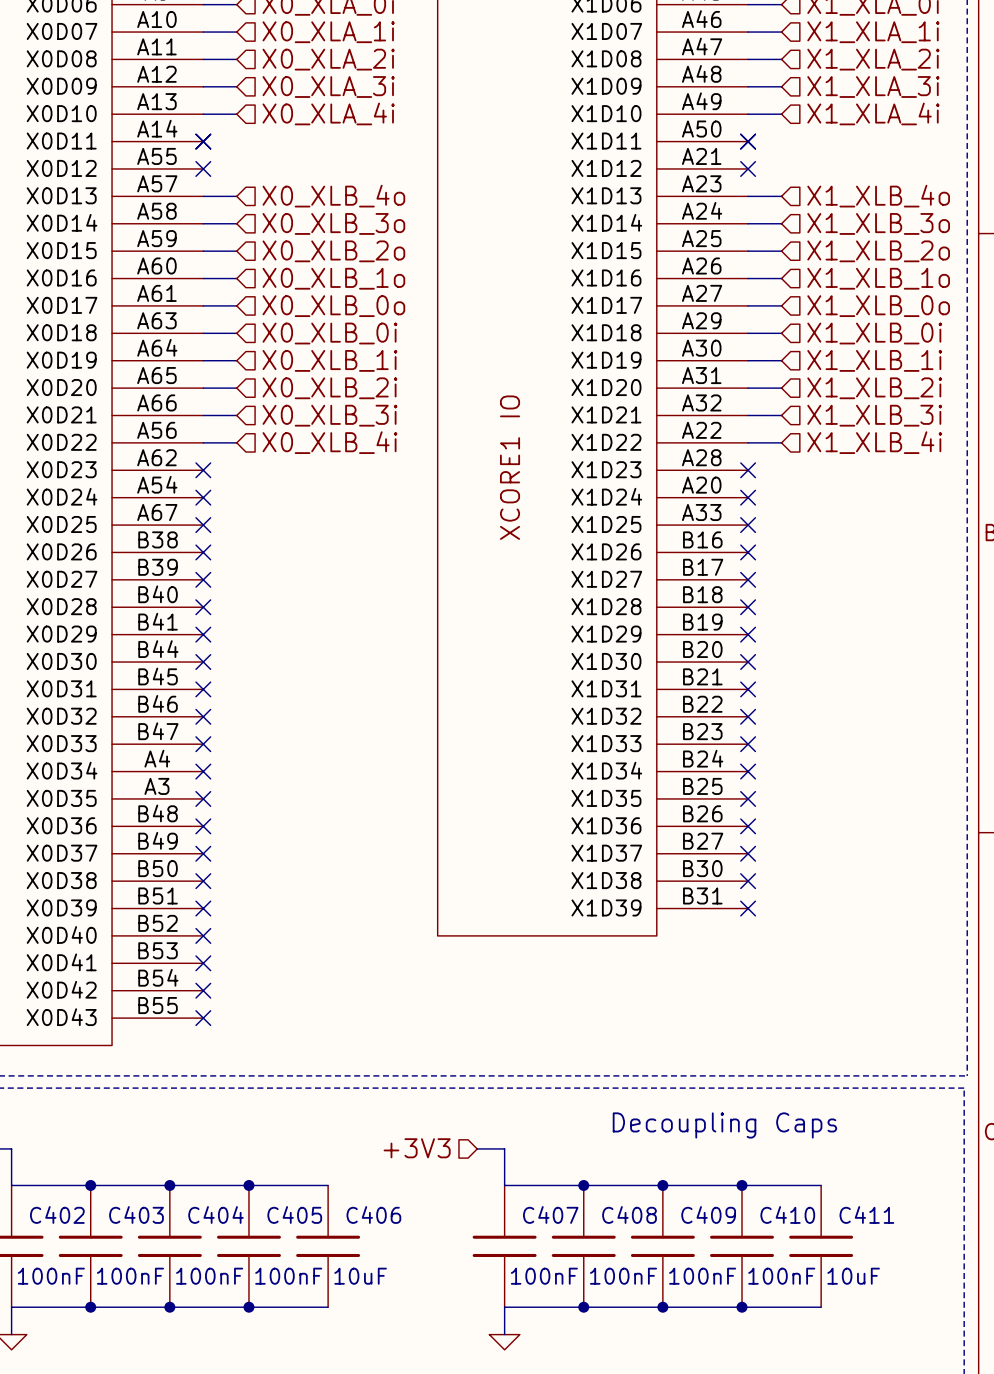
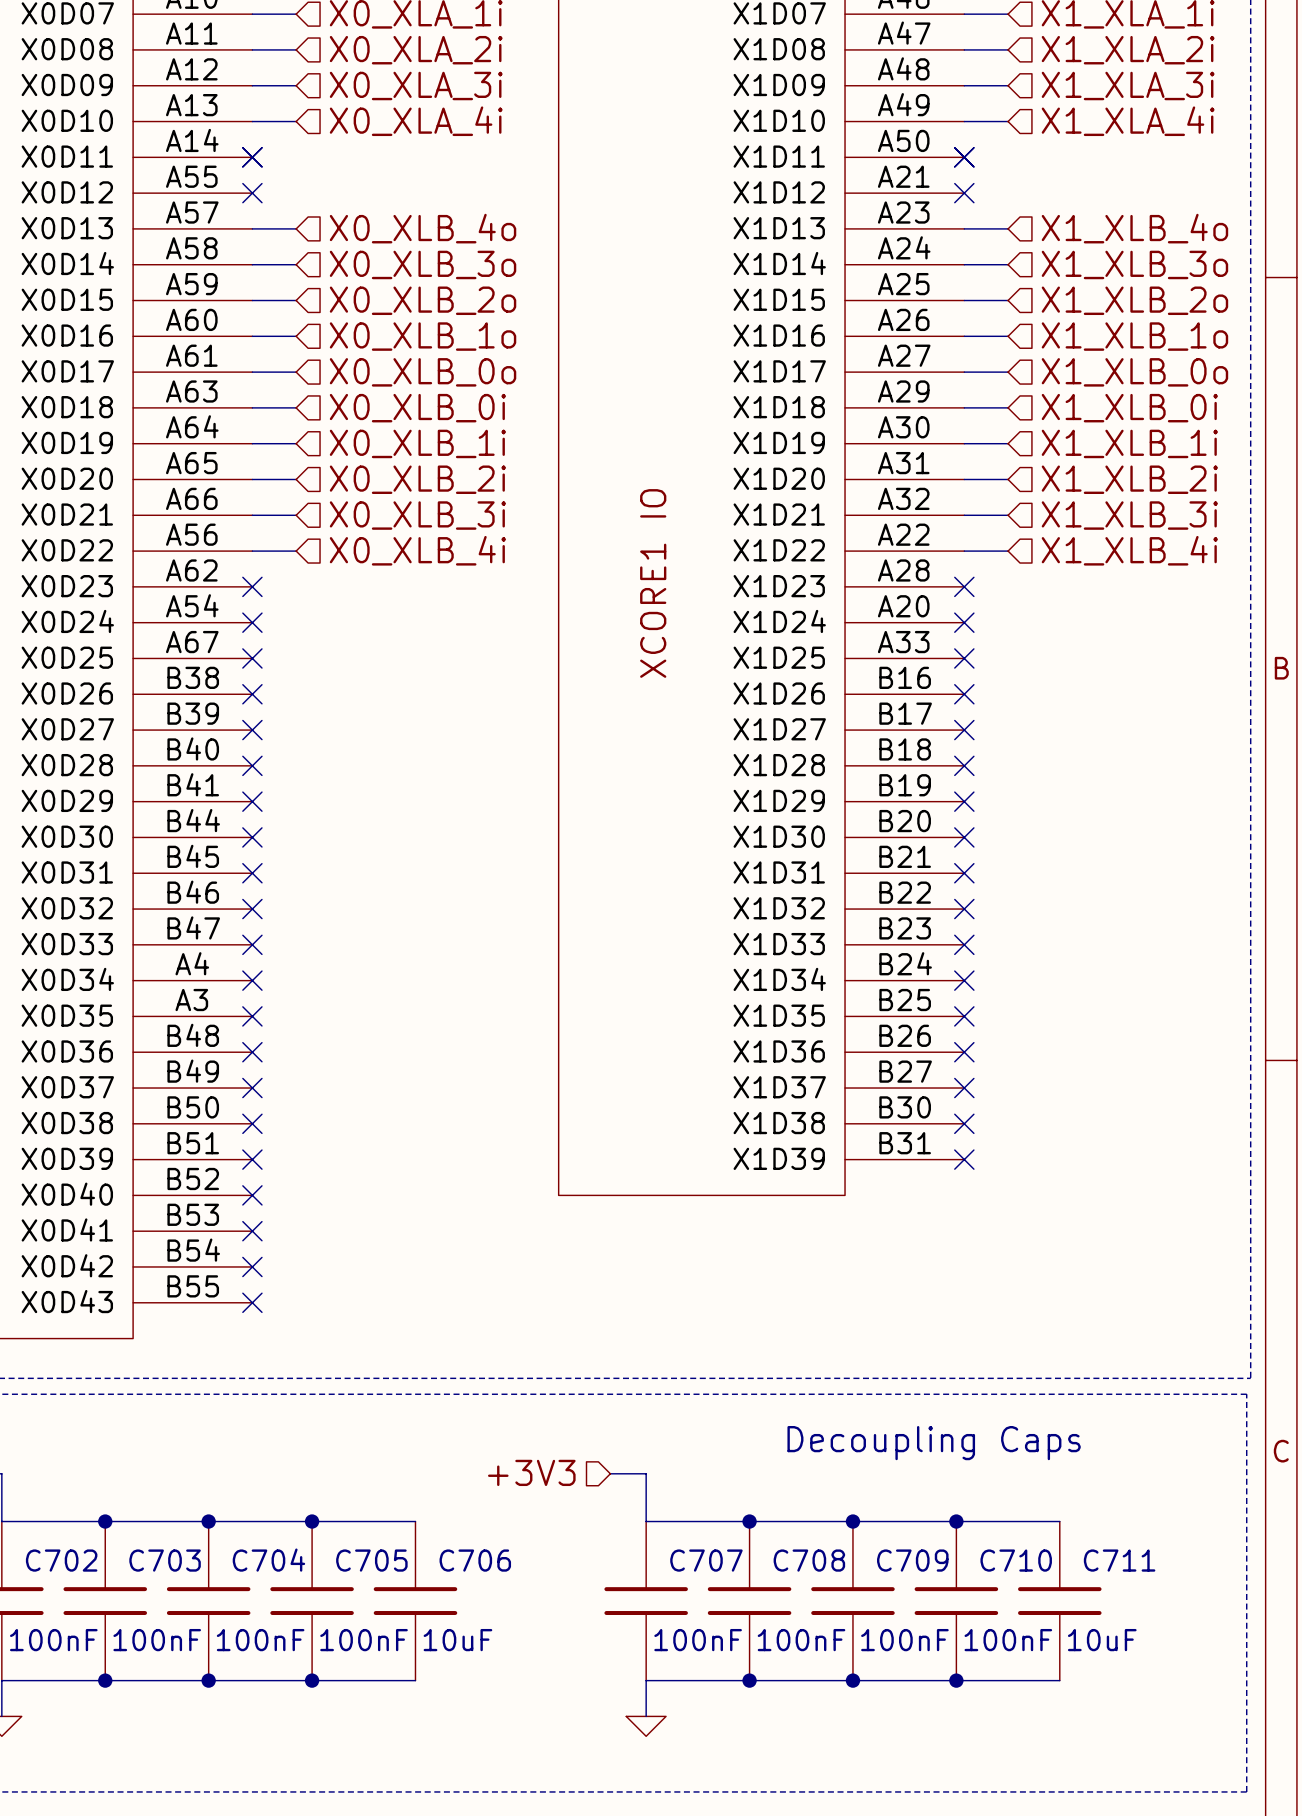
C402 name: C402 (57, 1214) -> C702 (61, 1560)
C403 name: C403 (136, 1214) -> C703 (165, 1560)
C404 name: C404 (215, 1214) -> C704 (268, 1560)
C405 name: C405 (294, 1214) -> C705 (371, 1560)
C406 name: C406 (373, 1214) -> C706 (475, 1560)
C407 name: C407 (550, 1214) -> C707 (706, 1560)
C408 name: C408 (629, 1214) -> C708 (809, 1560)
C409 name: C409 (708, 1214) -> C709 (912, 1560)
C410 name: C410 (787, 1214) -> C710 (1016, 1560)
C411 name: C411 (866, 1214) -> C711 (1119, 1560)

